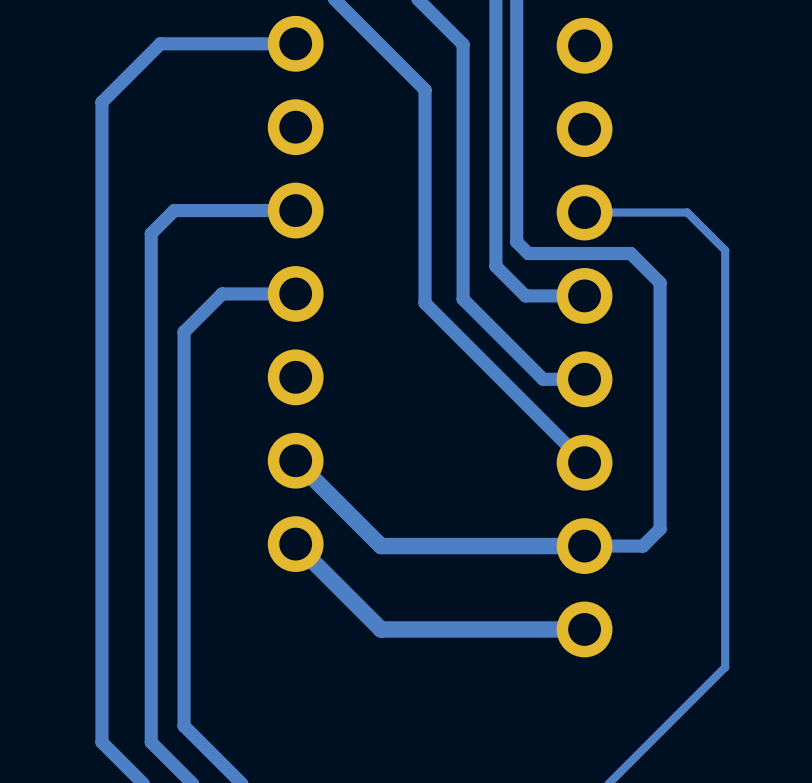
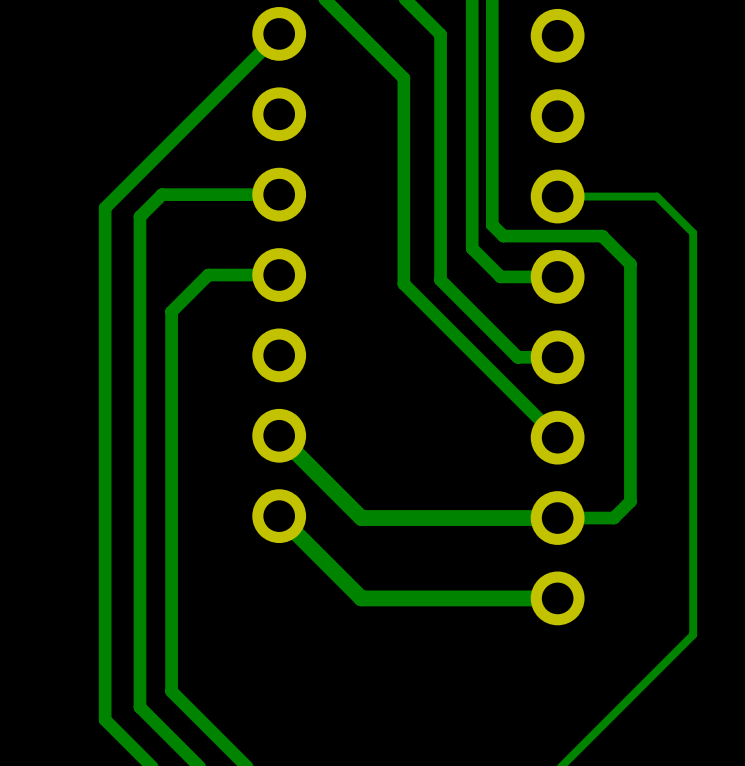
bottom track: (295, 43) (160, 43) (101, 102) (101, 742) (115, 755) -> (279, 33) (105, 207) (105, 719)

